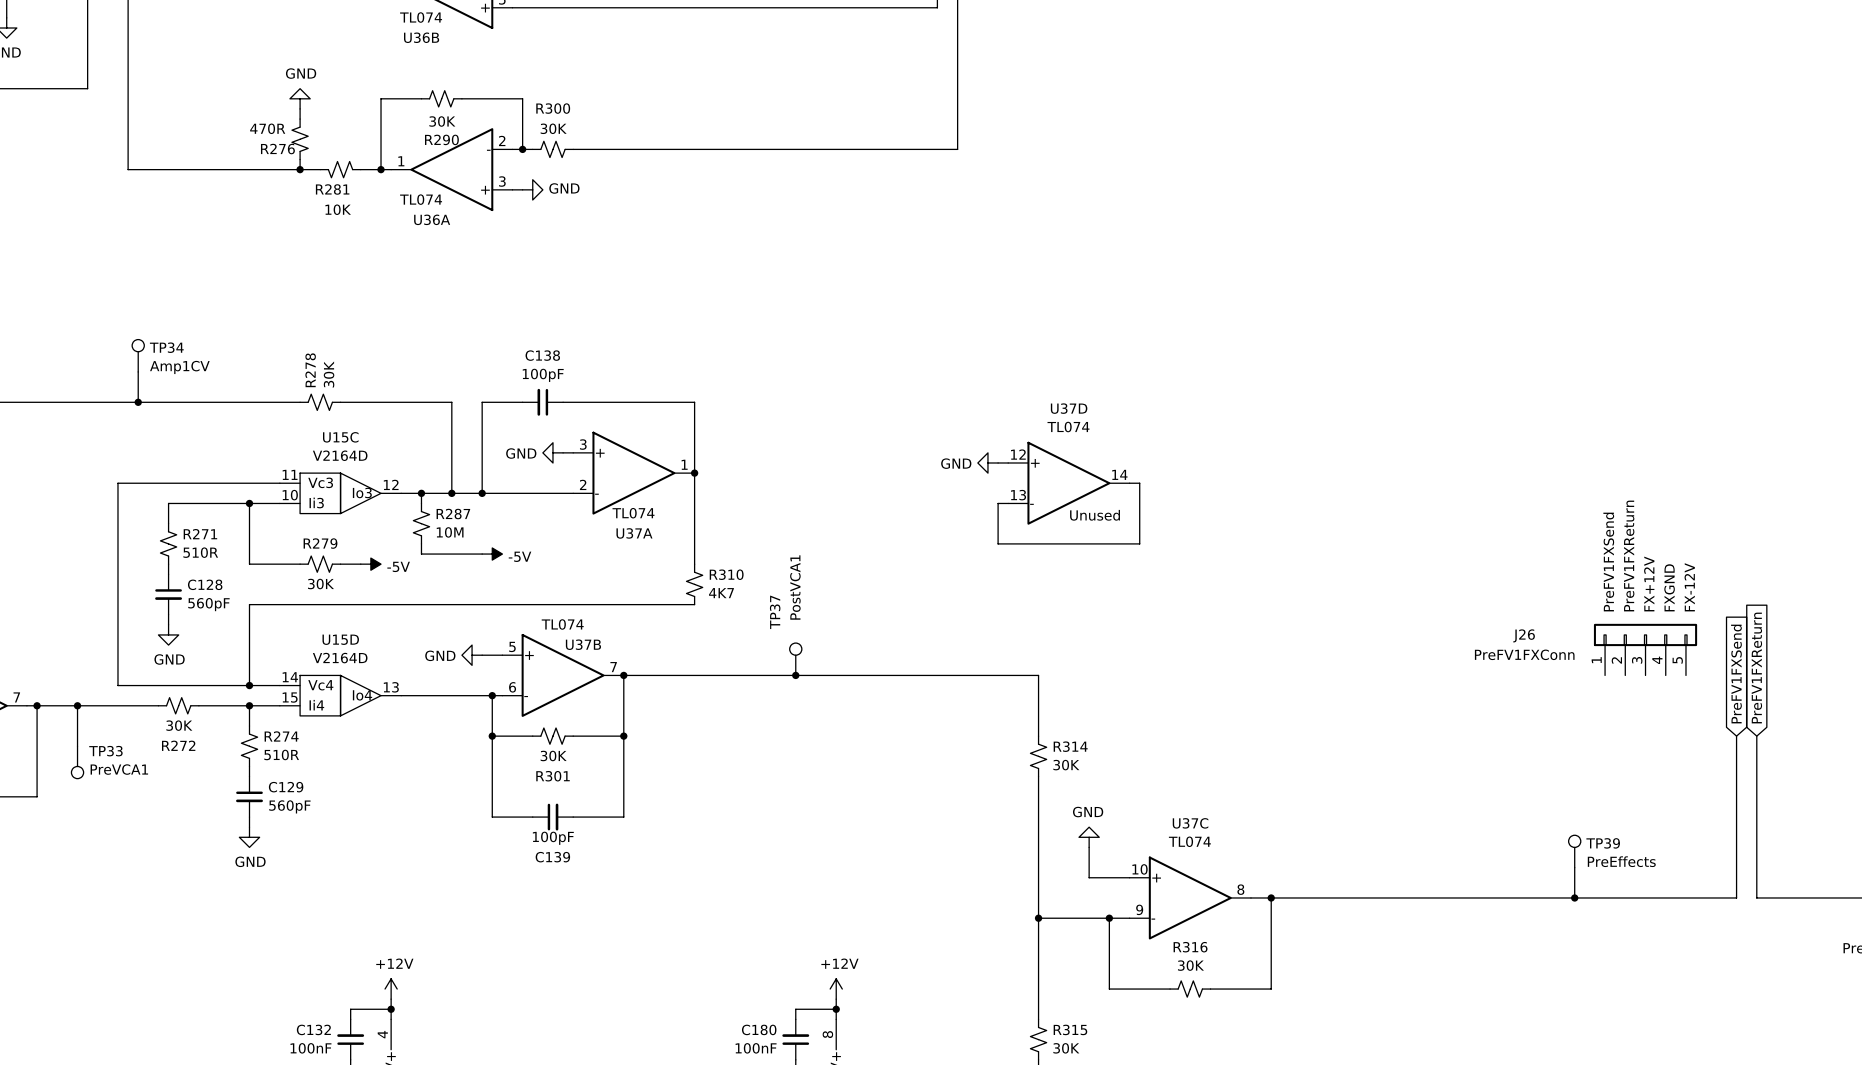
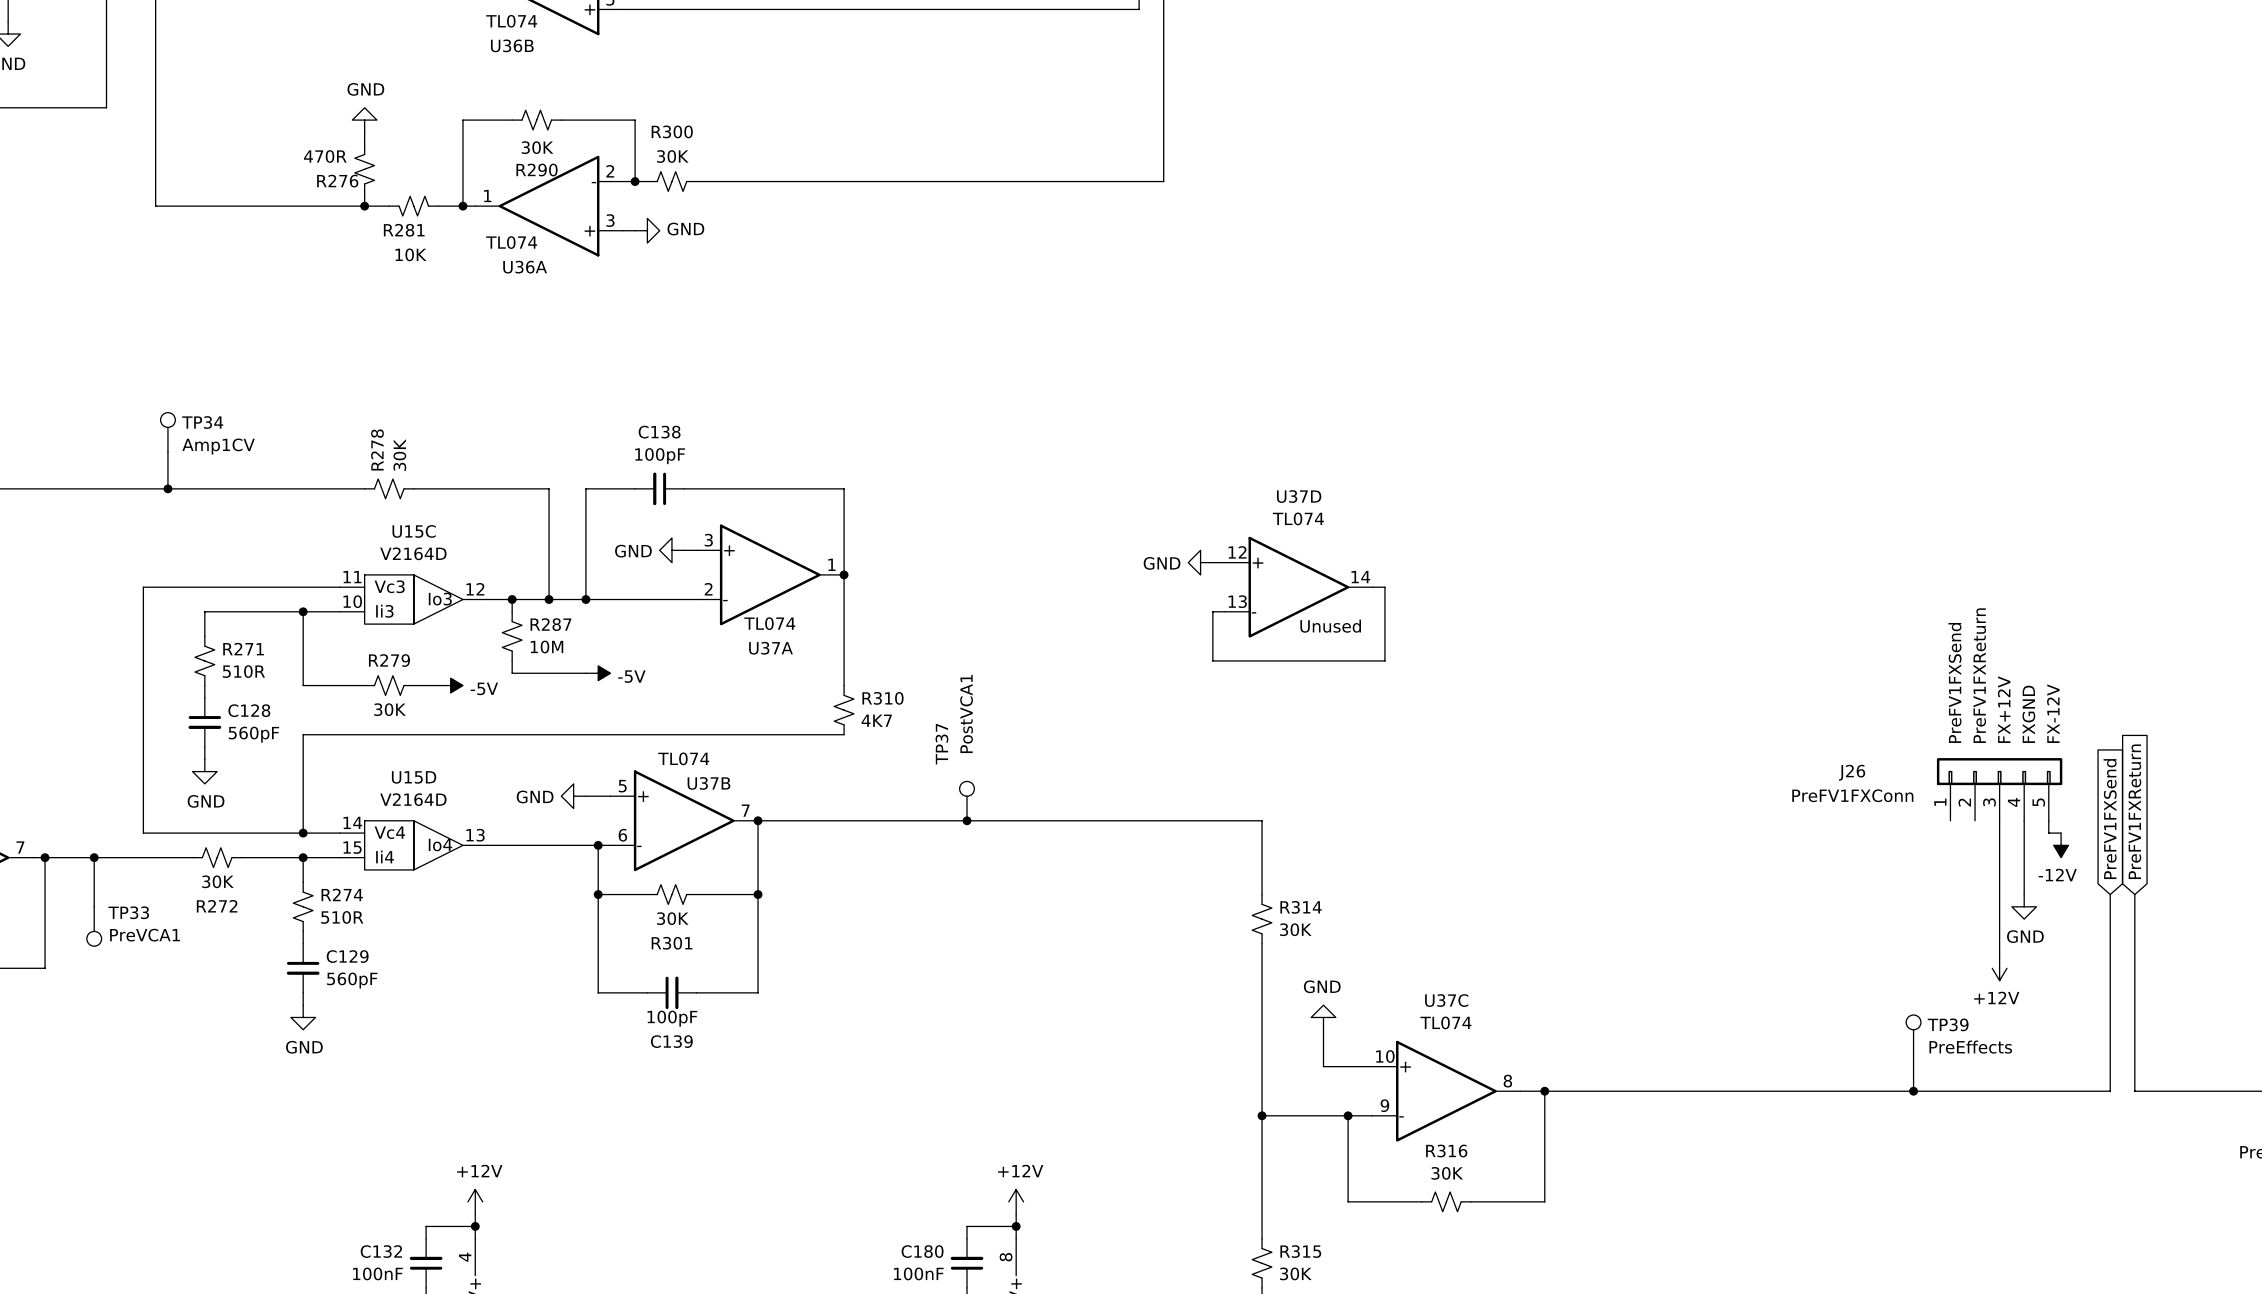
wire: none -> (1999, 820) (1999, 956)
wire: none -> (2024, 820) (2024, 894)
wire: none -> (2048, 820) (2048, 833) (2061, 833)
power symbol: none -> -12V (2061, 845)
power symbol: none -> GND (2024, 906)
power symbol: none -> +12V (1999, 968)

